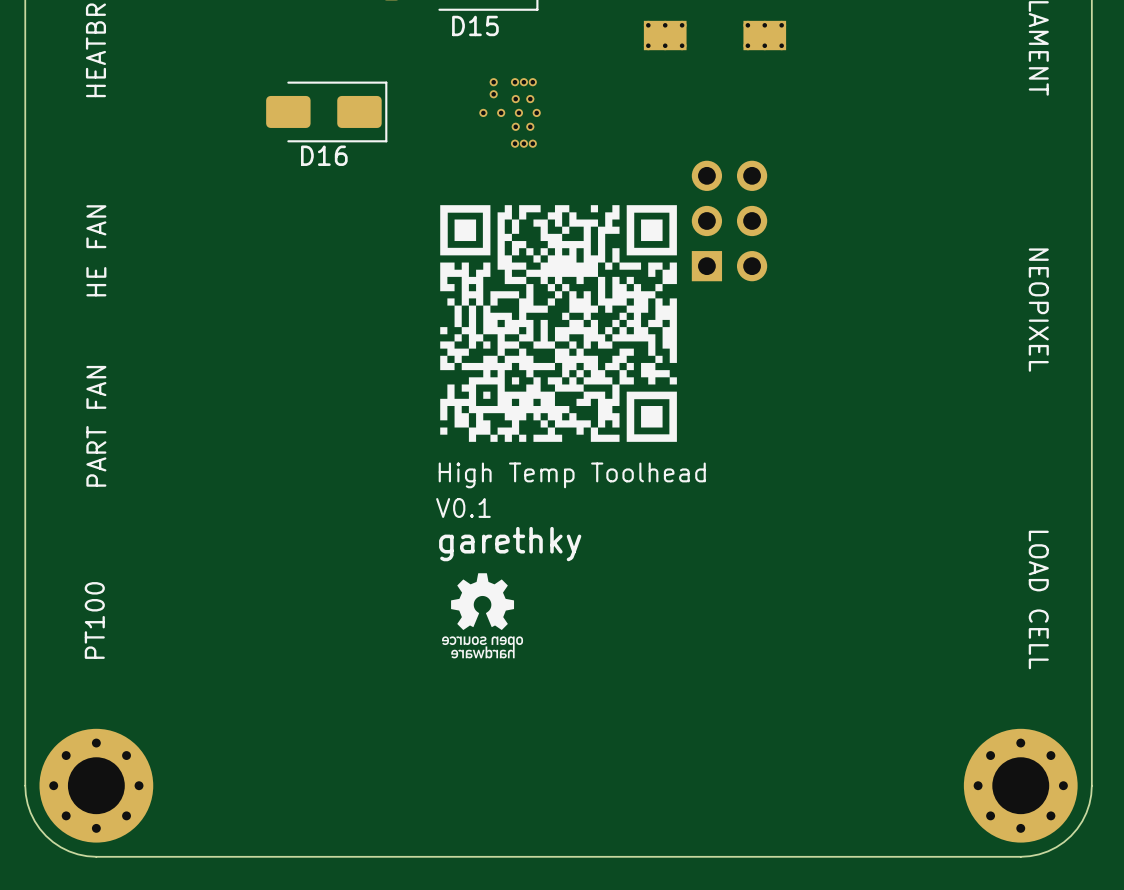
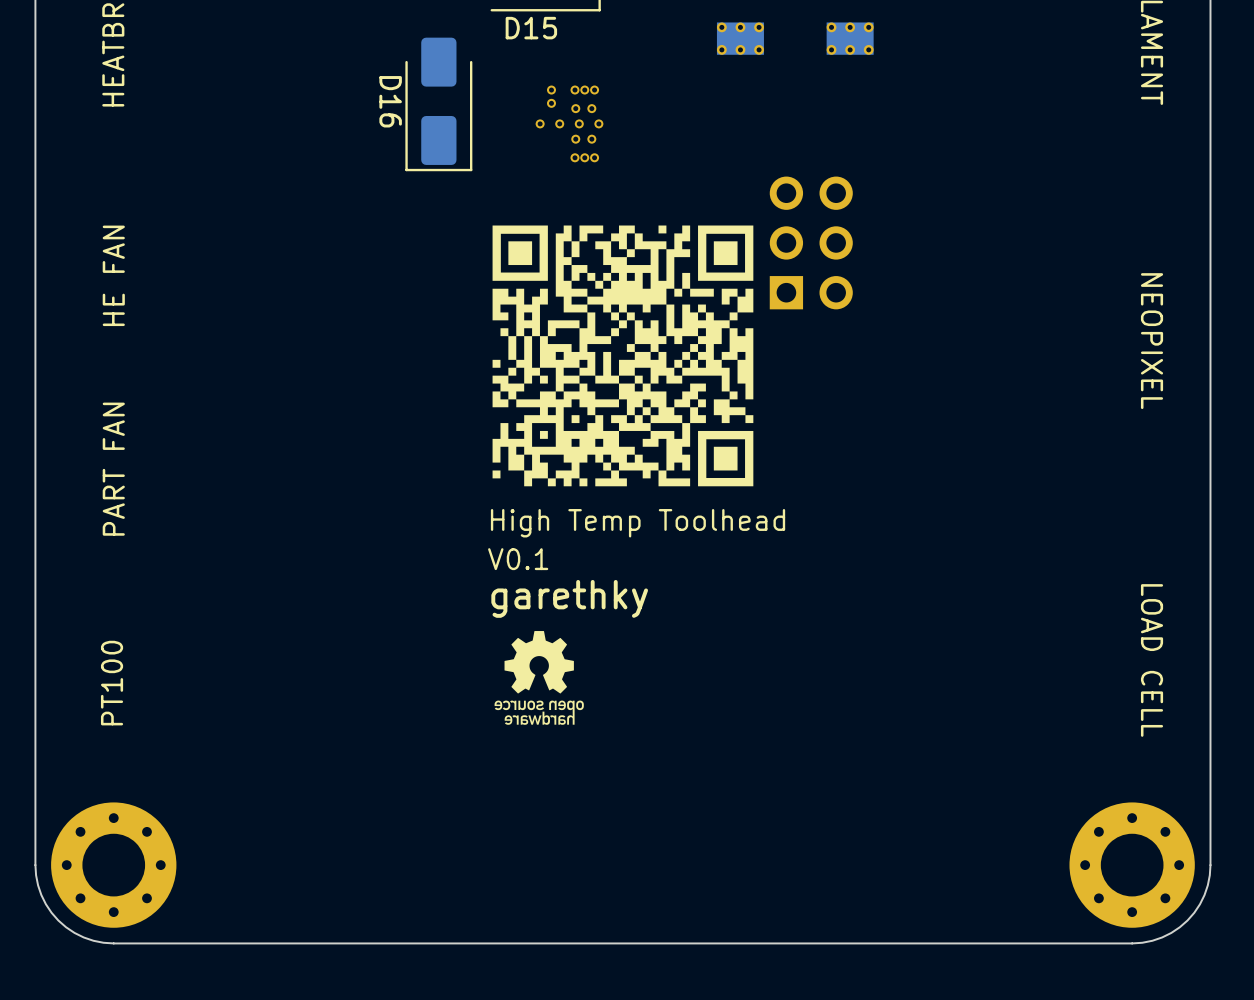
D16 rotation: 0° (326, 111) -> 90° clockwise (438, 104)

